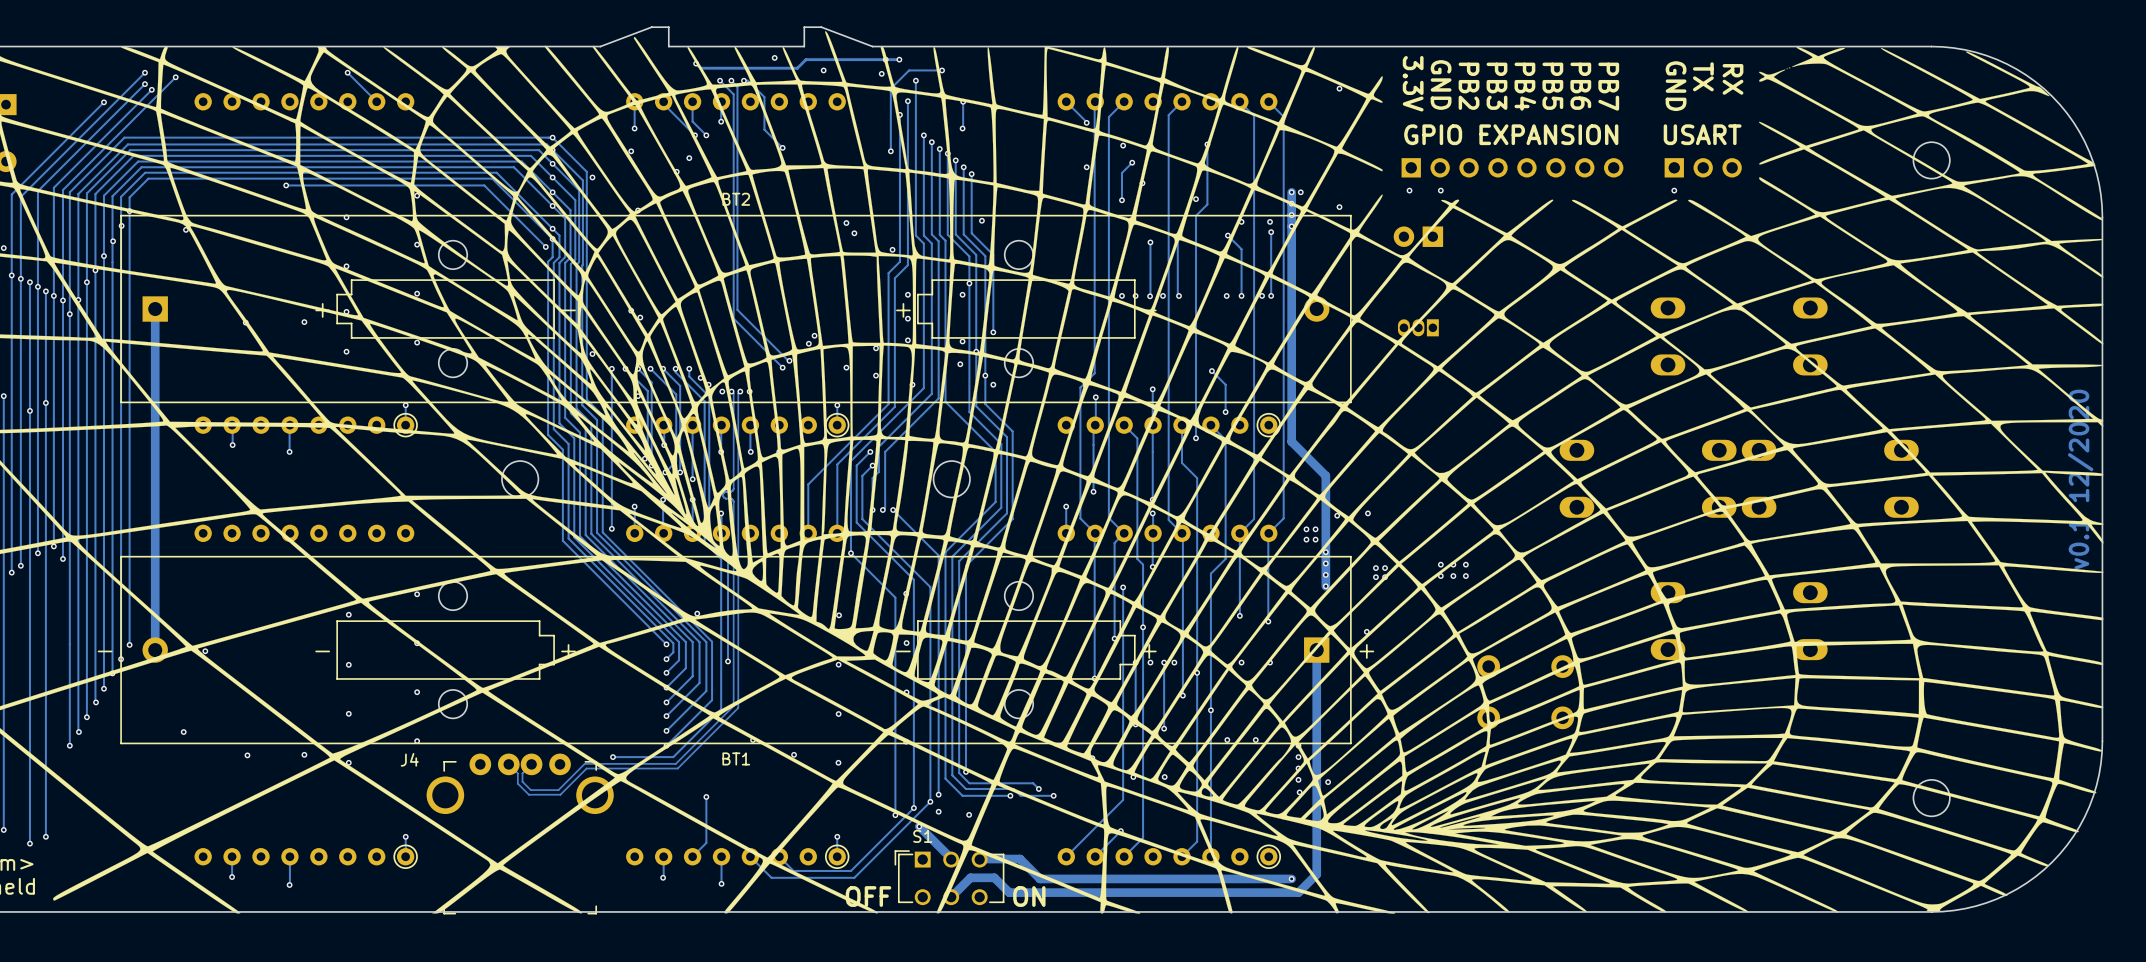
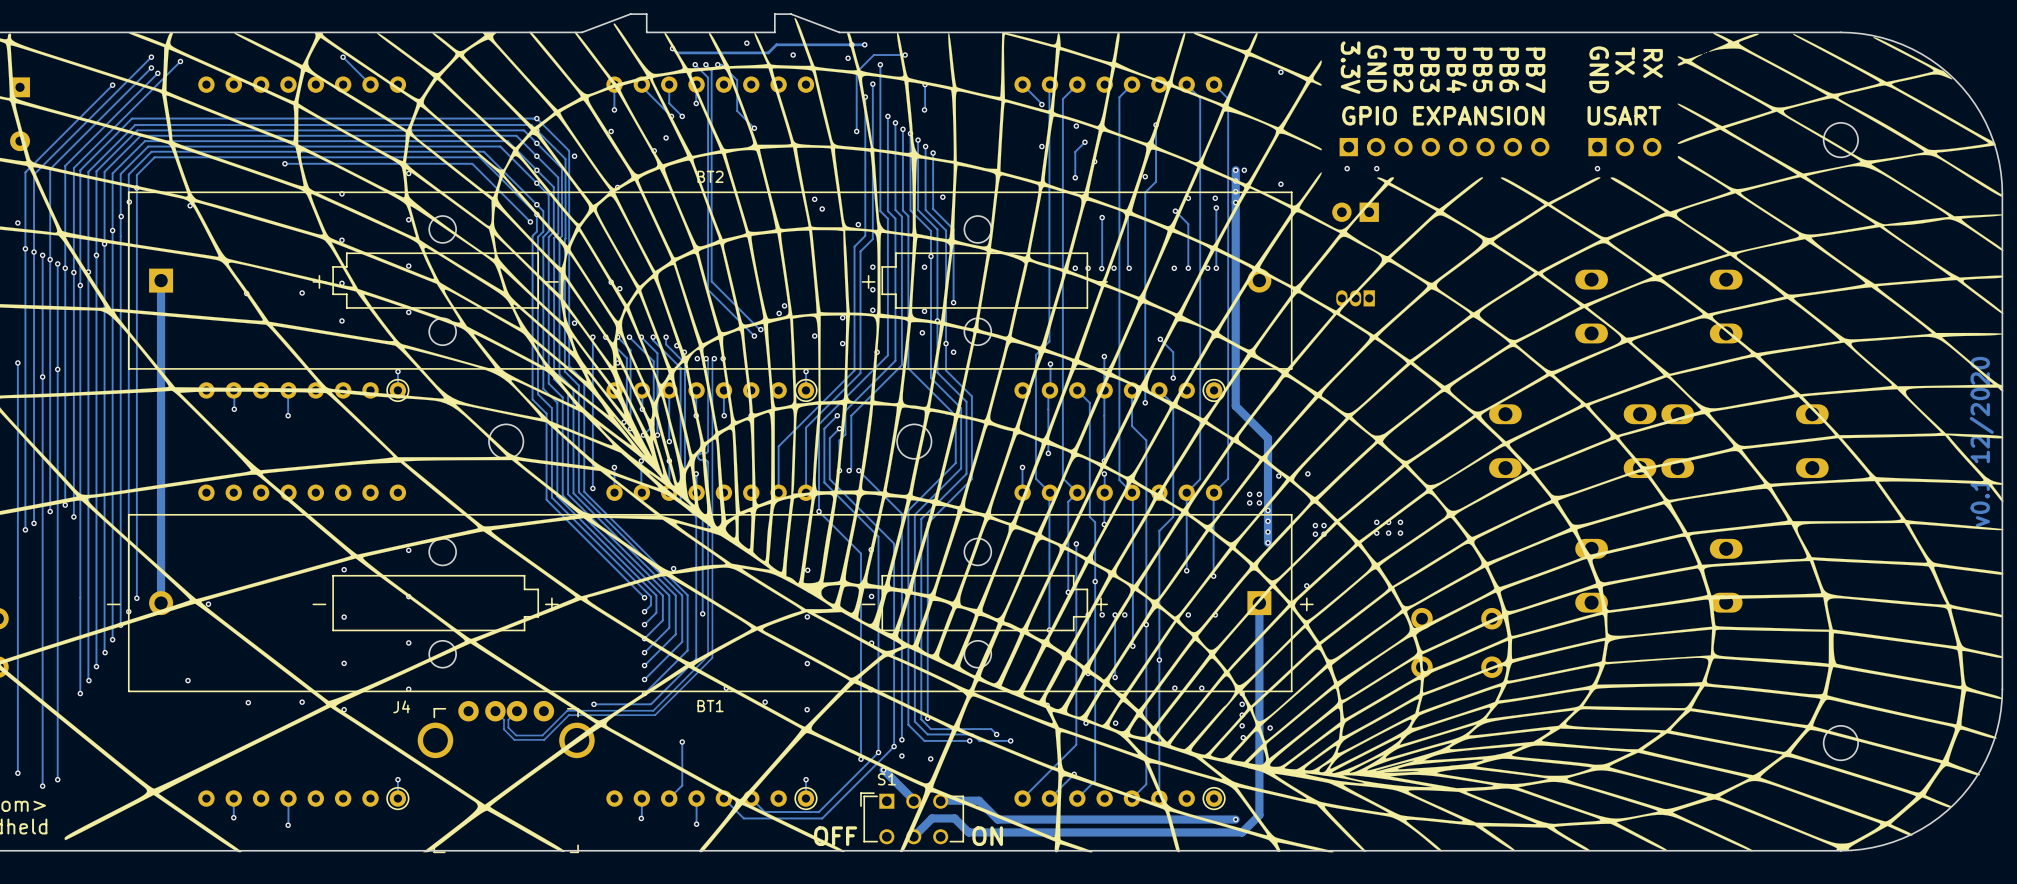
via: (1306, 529) -> none
via: (1315, 529) -> none
via: none -> (1249, 494)
via: none -> (1259, 494)
via: (1306, 539) -> none
via: (1315, 539) -> none
via: none -> (1249, 502)
via: none -> (1259, 502)

